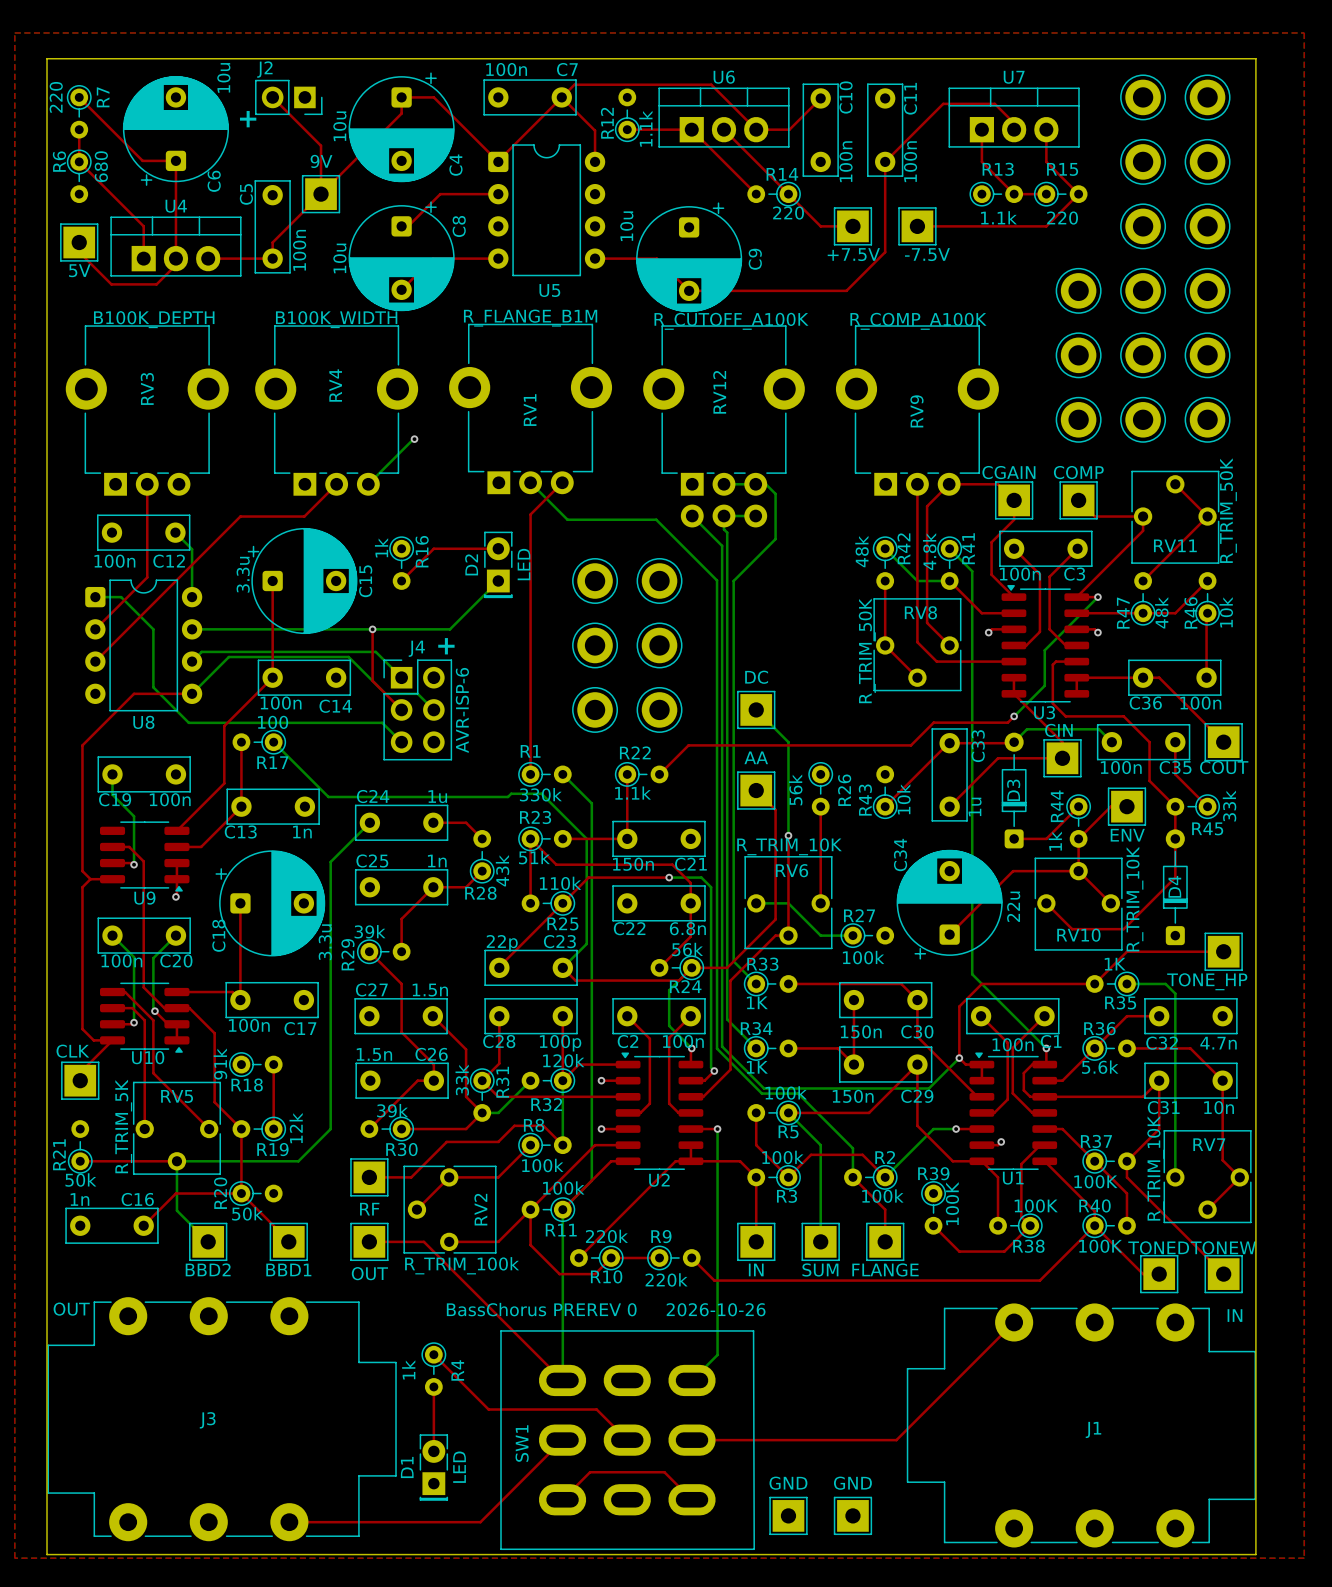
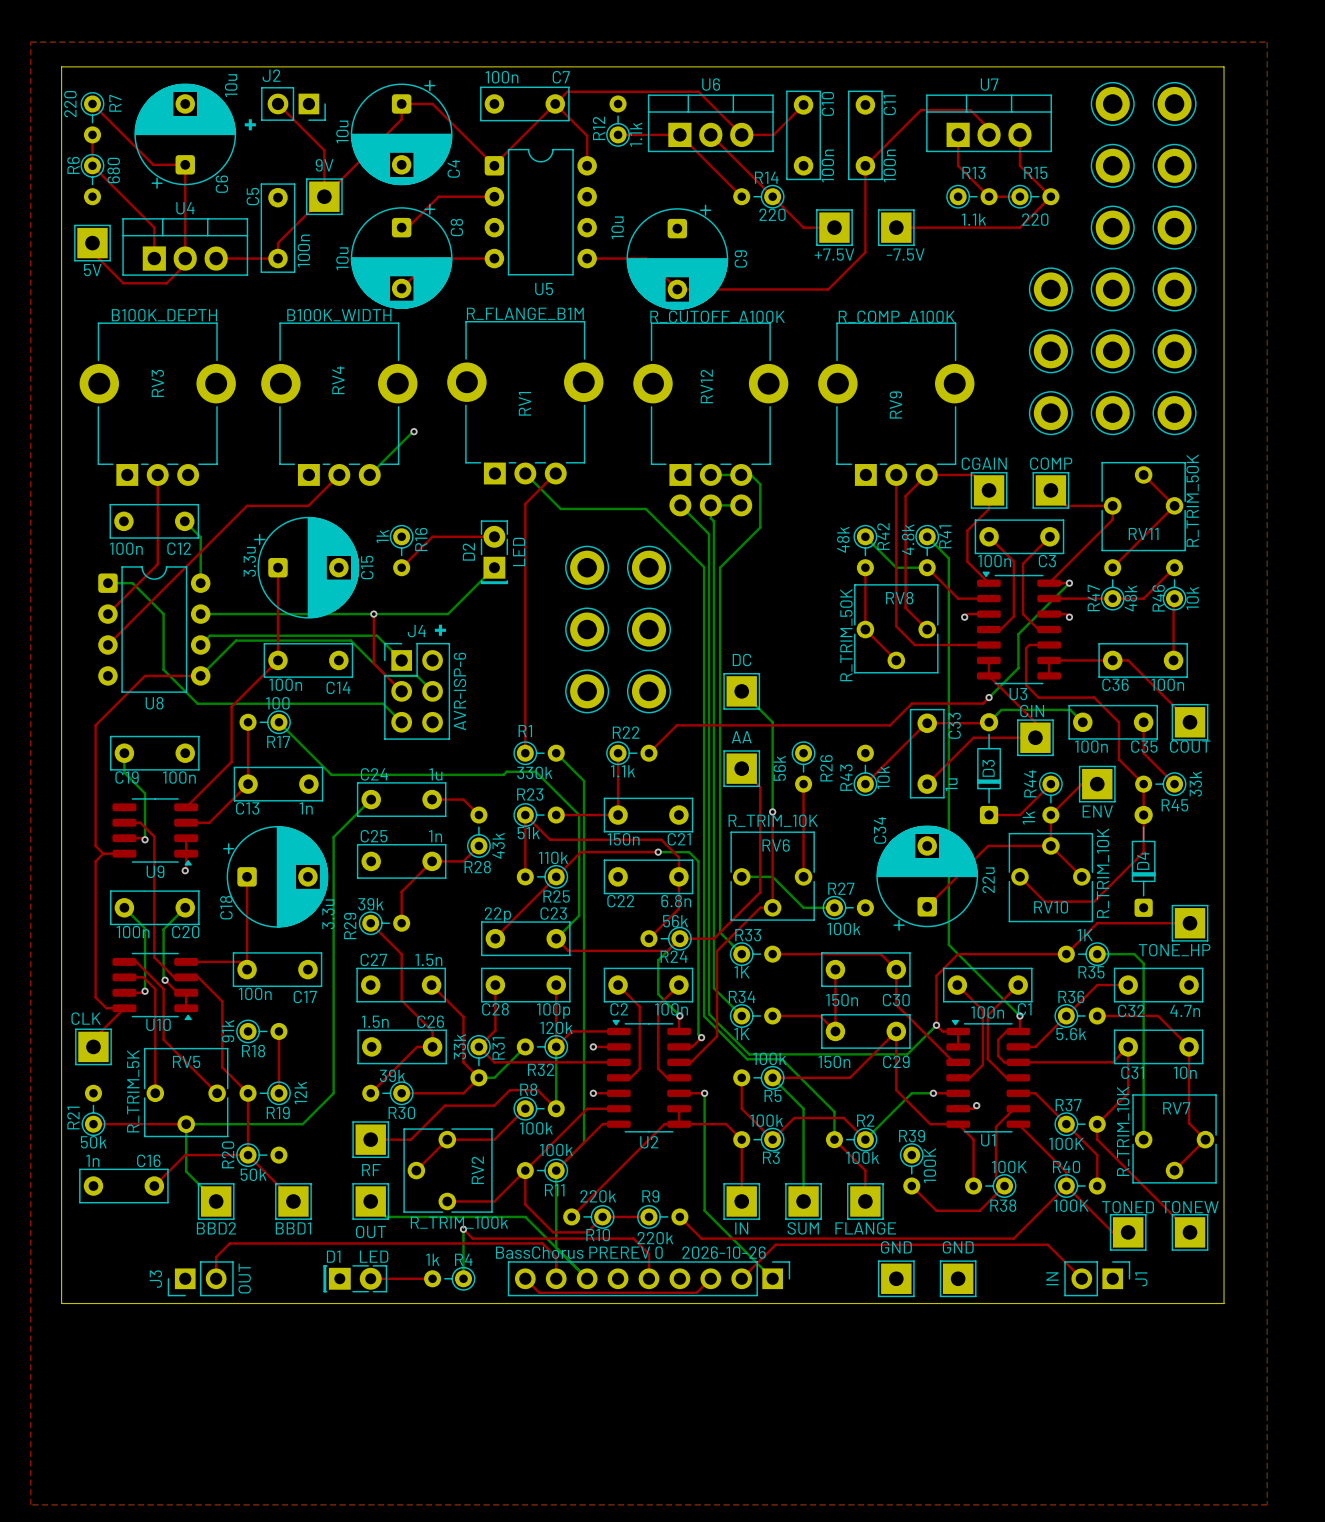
board edge: (1255, 58) (1255, 1554) (47, 1554) (47, 1348) -> (1220, 66) (1224, 66) (1224, 1303) (61, 1303)
top track: (369, 1241) (423, 1241) (562, 1380) -> none
bottom track: none -> (370, 1201) (386, 1216) (525, 1216) (587, 1278)
bottom track: (717, 1251) (717, 1354) (692, 1380) -> (704, 1210) (772, 1278)
top track: none -> (463, 1229) (472, 1238) (633, 1238) (648, 1254) (648, 1278)
bottom track: none -> (463, 1229) (463, 1278)
via: none -> (463, 1229)
bottom track: (562, 1290) (562, 1380) -> none
J3 footprint: [47, 1297, 397, 1542] -> [167, 1261, 234, 1297]
J1 footprint: [906, 1303, 1257, 1548] -> [1064, 1261, 1131, 1297]
J3 value position: OUT (71, 1309) -> OUT (244, 1278)
text position: BassChorus PREREV 0 2026-10-26 (606, 1309) -> BassChorus PREREV 0 2026-10-26 (630, 1252)
J1 value position: IN (1234, 1315) -> IN (1052, 1278)
top track: none -> (216, 1278) (216, 1257) (229, 1243) (542, 1243) (556, 1257) (556, 1278)
top track: none -> (370, 1278) (432, 1278)
top track: none -> (525, 1278) (539, 1292) (696, 1292) (710, 1278)
part: none -> (648, 1278)
top track: none -> (741, 1278) (775, 1244) (1047, 1244) (1081, 1278)
part: none -> GND (896, 1278)
part: none -> GND (958, 1278)
top track: (1014, 1322) (896, 1440) (692, 1440) -> none
top track: (433, 1354) (488, 1409) (596, 1409) (627, 1440) -> none
R4 rotation: 0° (433, 1369) -> 90° clockwise (449, 1278)
R4 position: (433, 1369) -> (449, 1278)
top track: (433, 1386) (433, 1451) -> none
J3 name position: J3 (207, 1420) -> J3 (155, 1279)
J1 name position: J1 (1093, 1429) -> J1 (1141, 1279)
top track: (562, 1440) (480, 1522) (289, 1522) -> none
SW1: (627, 1440) -> none
D1 rotation: 0° (433, 1467) -> 90° clockwise (355, 1278)
D1 position: (433, 1467) -> (355, 1278)
top track: (562, 1499) (590, 1472) (664, 1472) (692, 1499) -> none
part: GND (788, 1515) -> none
part: GND (852, 1515) -> none

